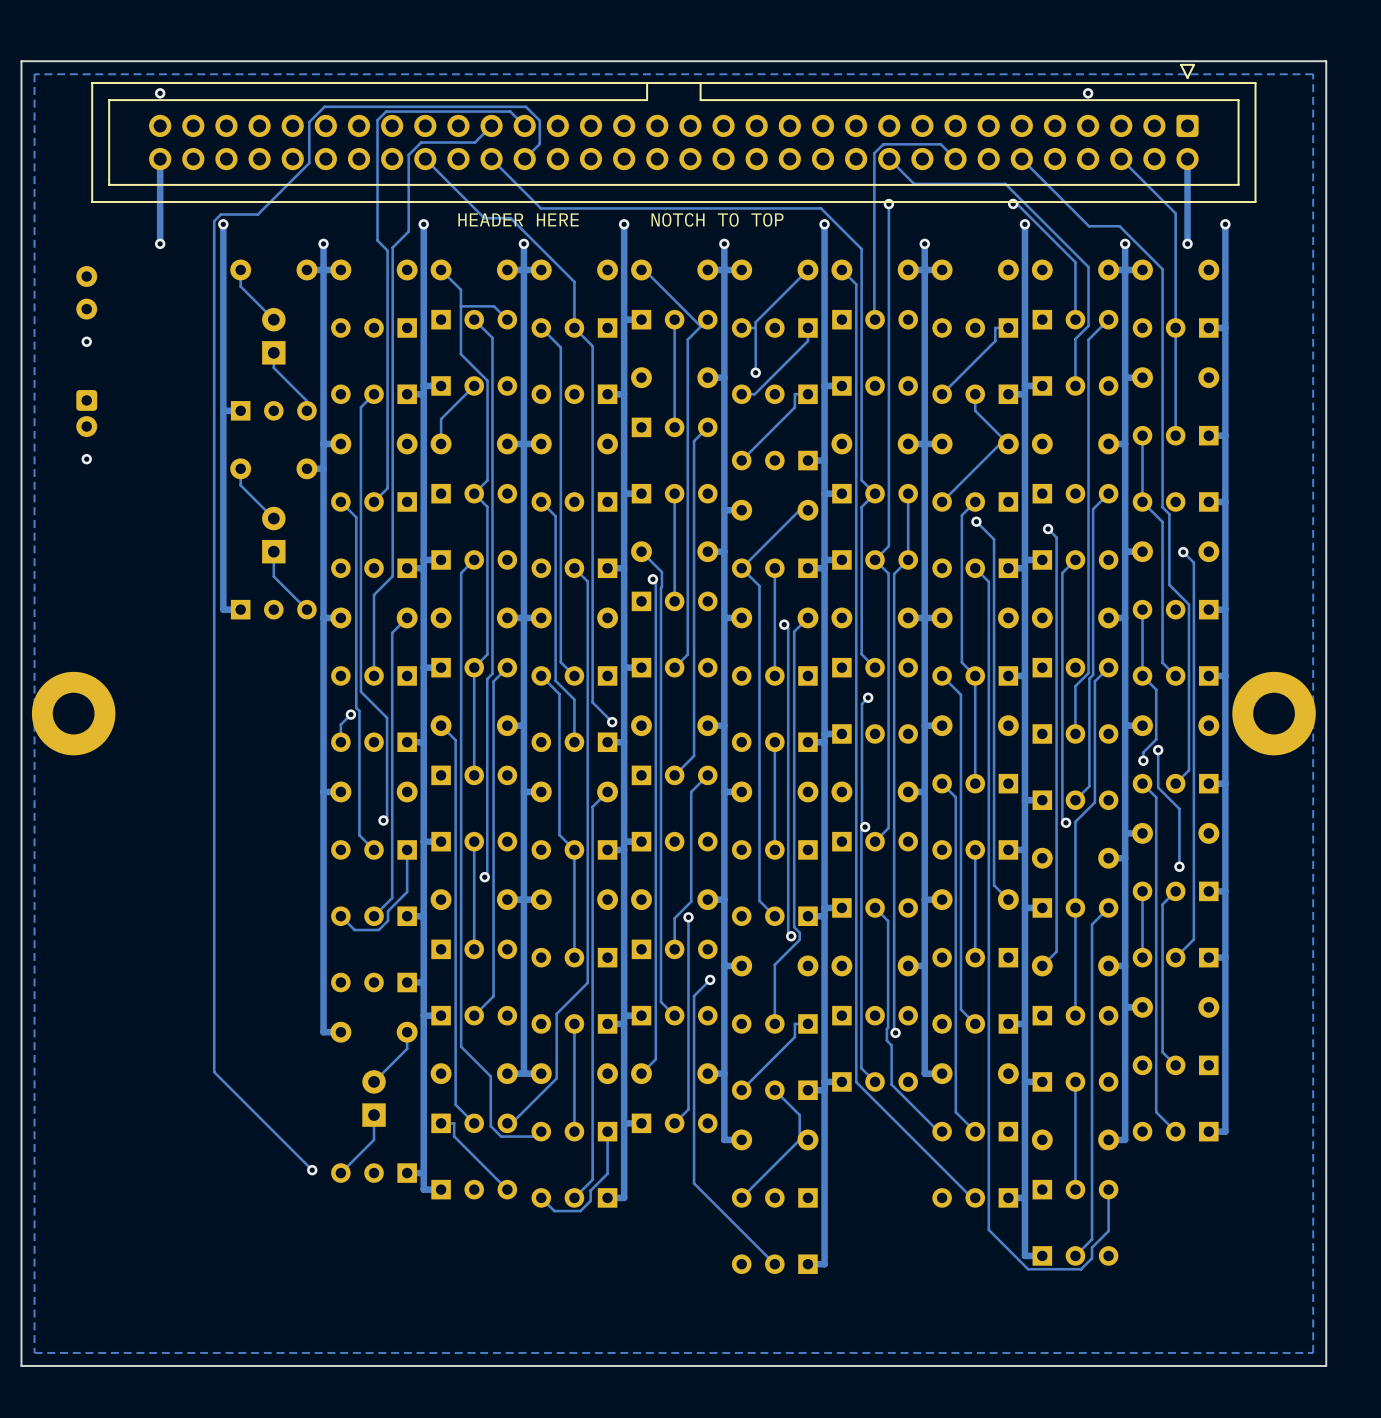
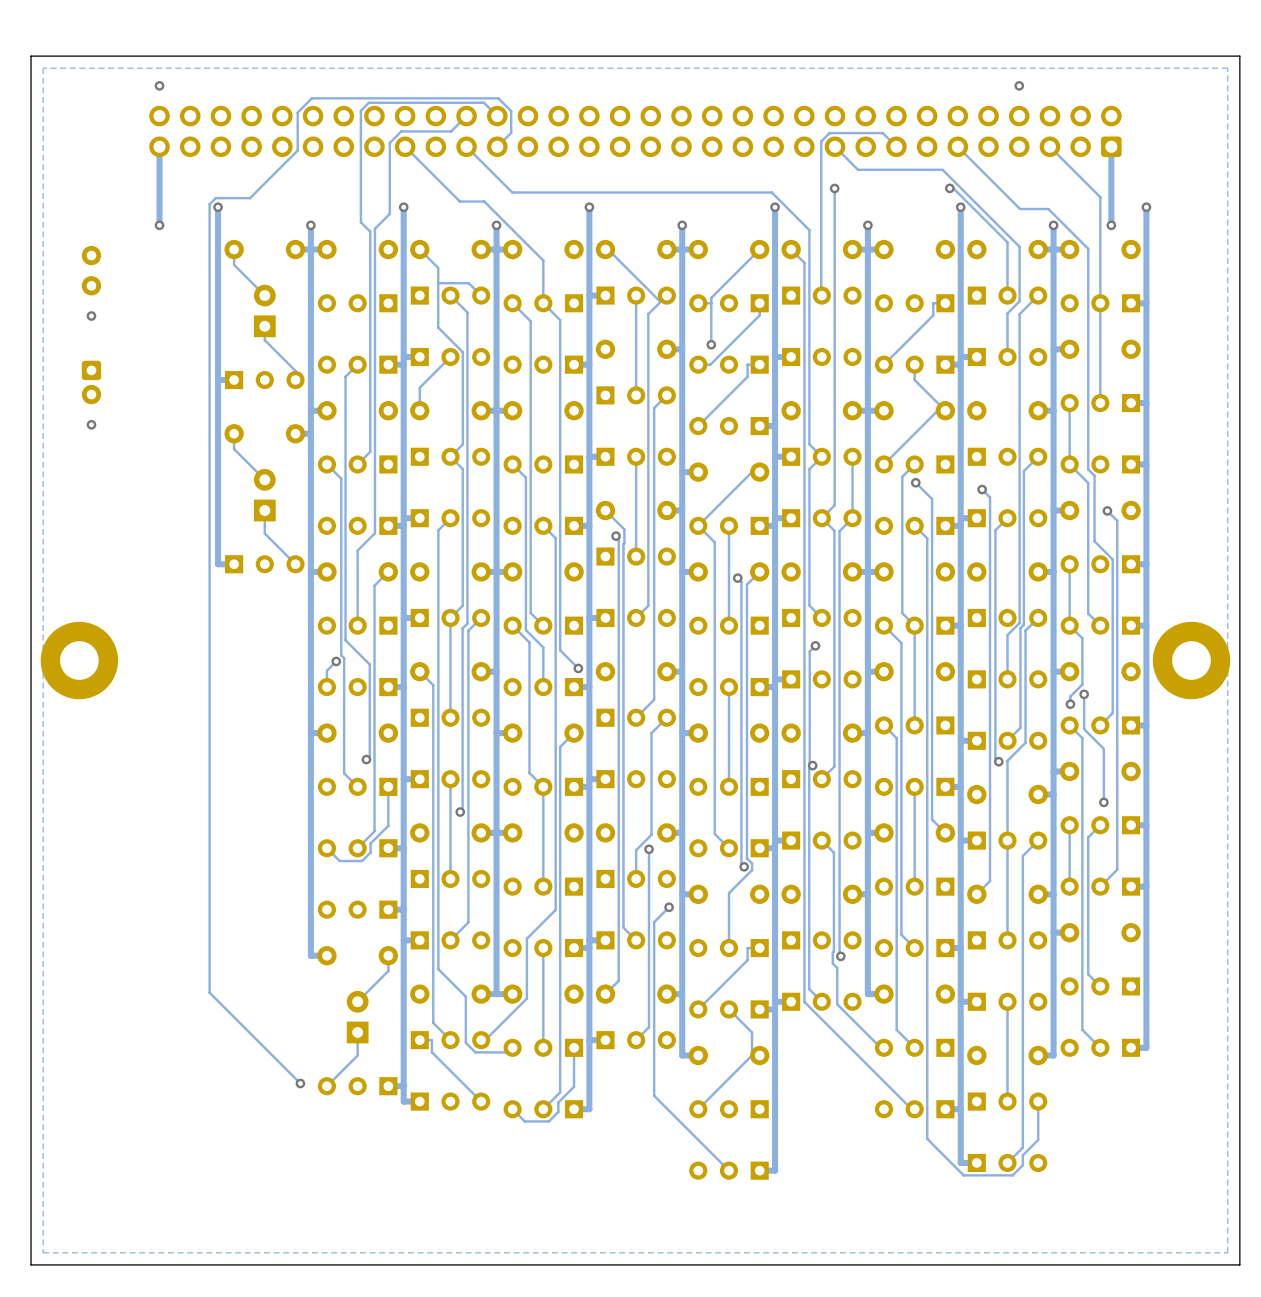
part side: bottom (673, 133) -> top (635, 131)
text: HEADER HERE (518, 219) -> none
text: NOTCH TO TOP (717, 219) -> none

